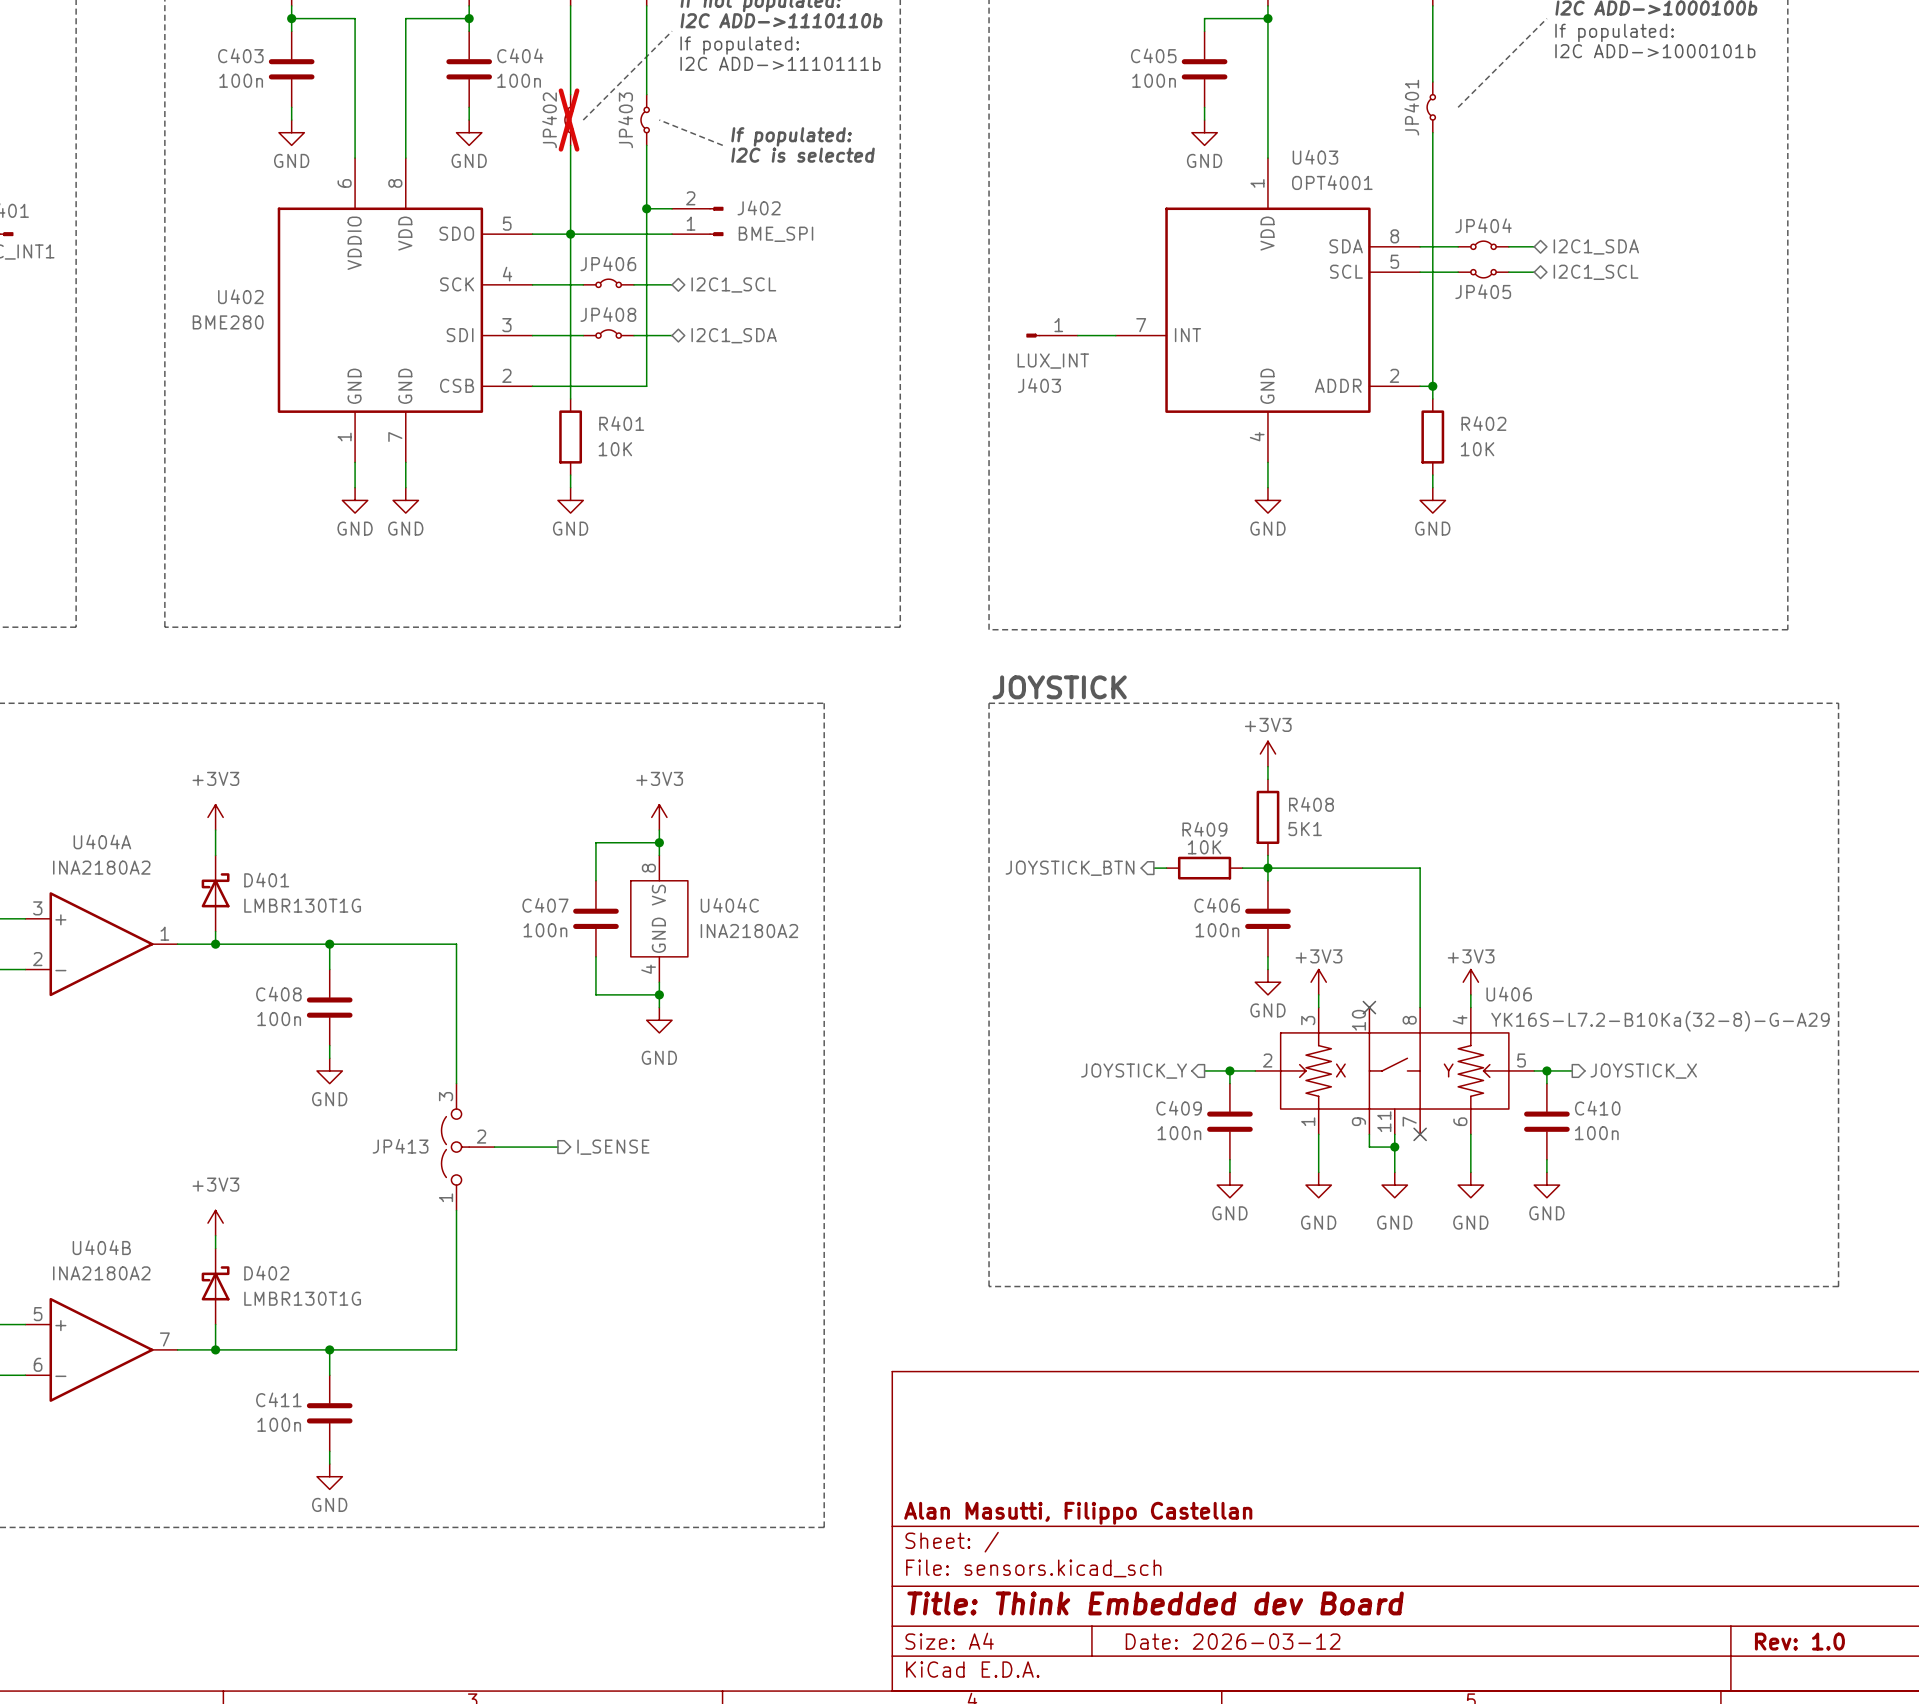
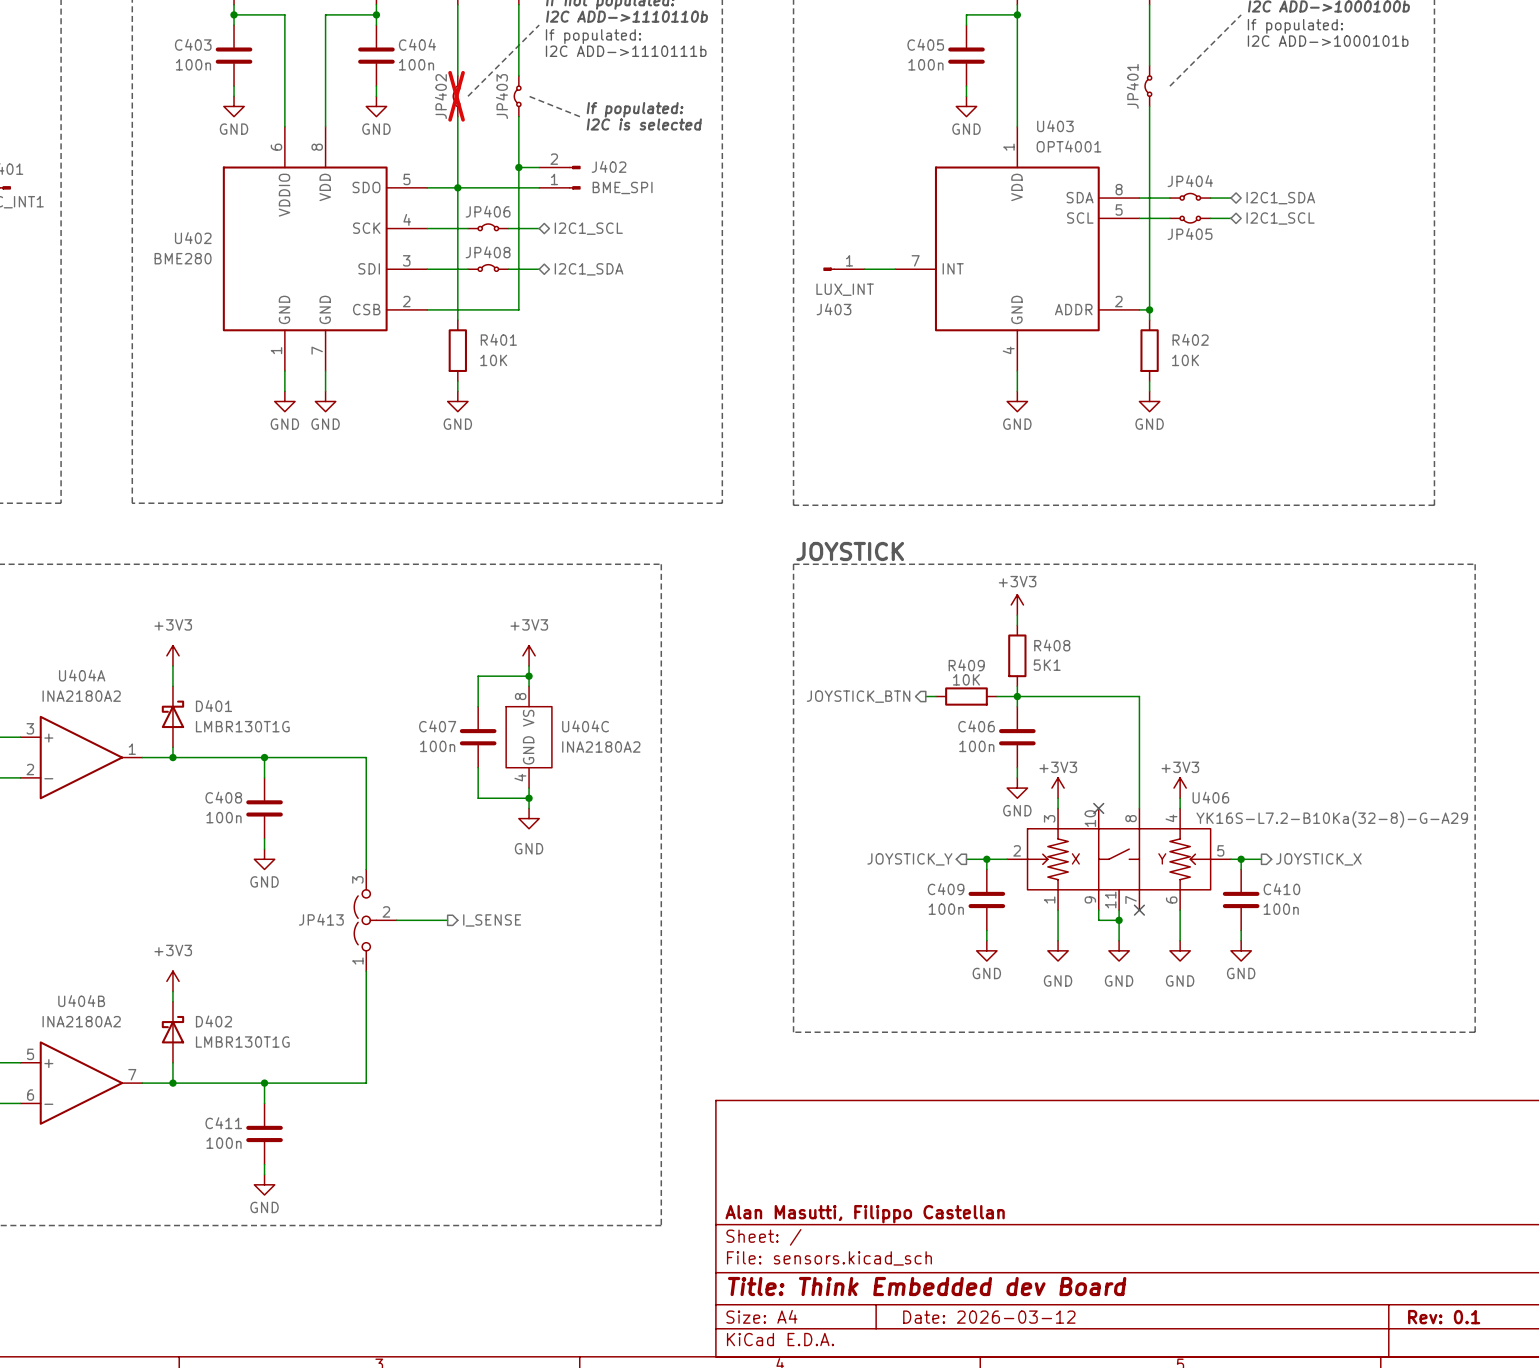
title block: Rev: 1.0 (1799, 1641) -> Rev: 0.1 (1444, 1317)

